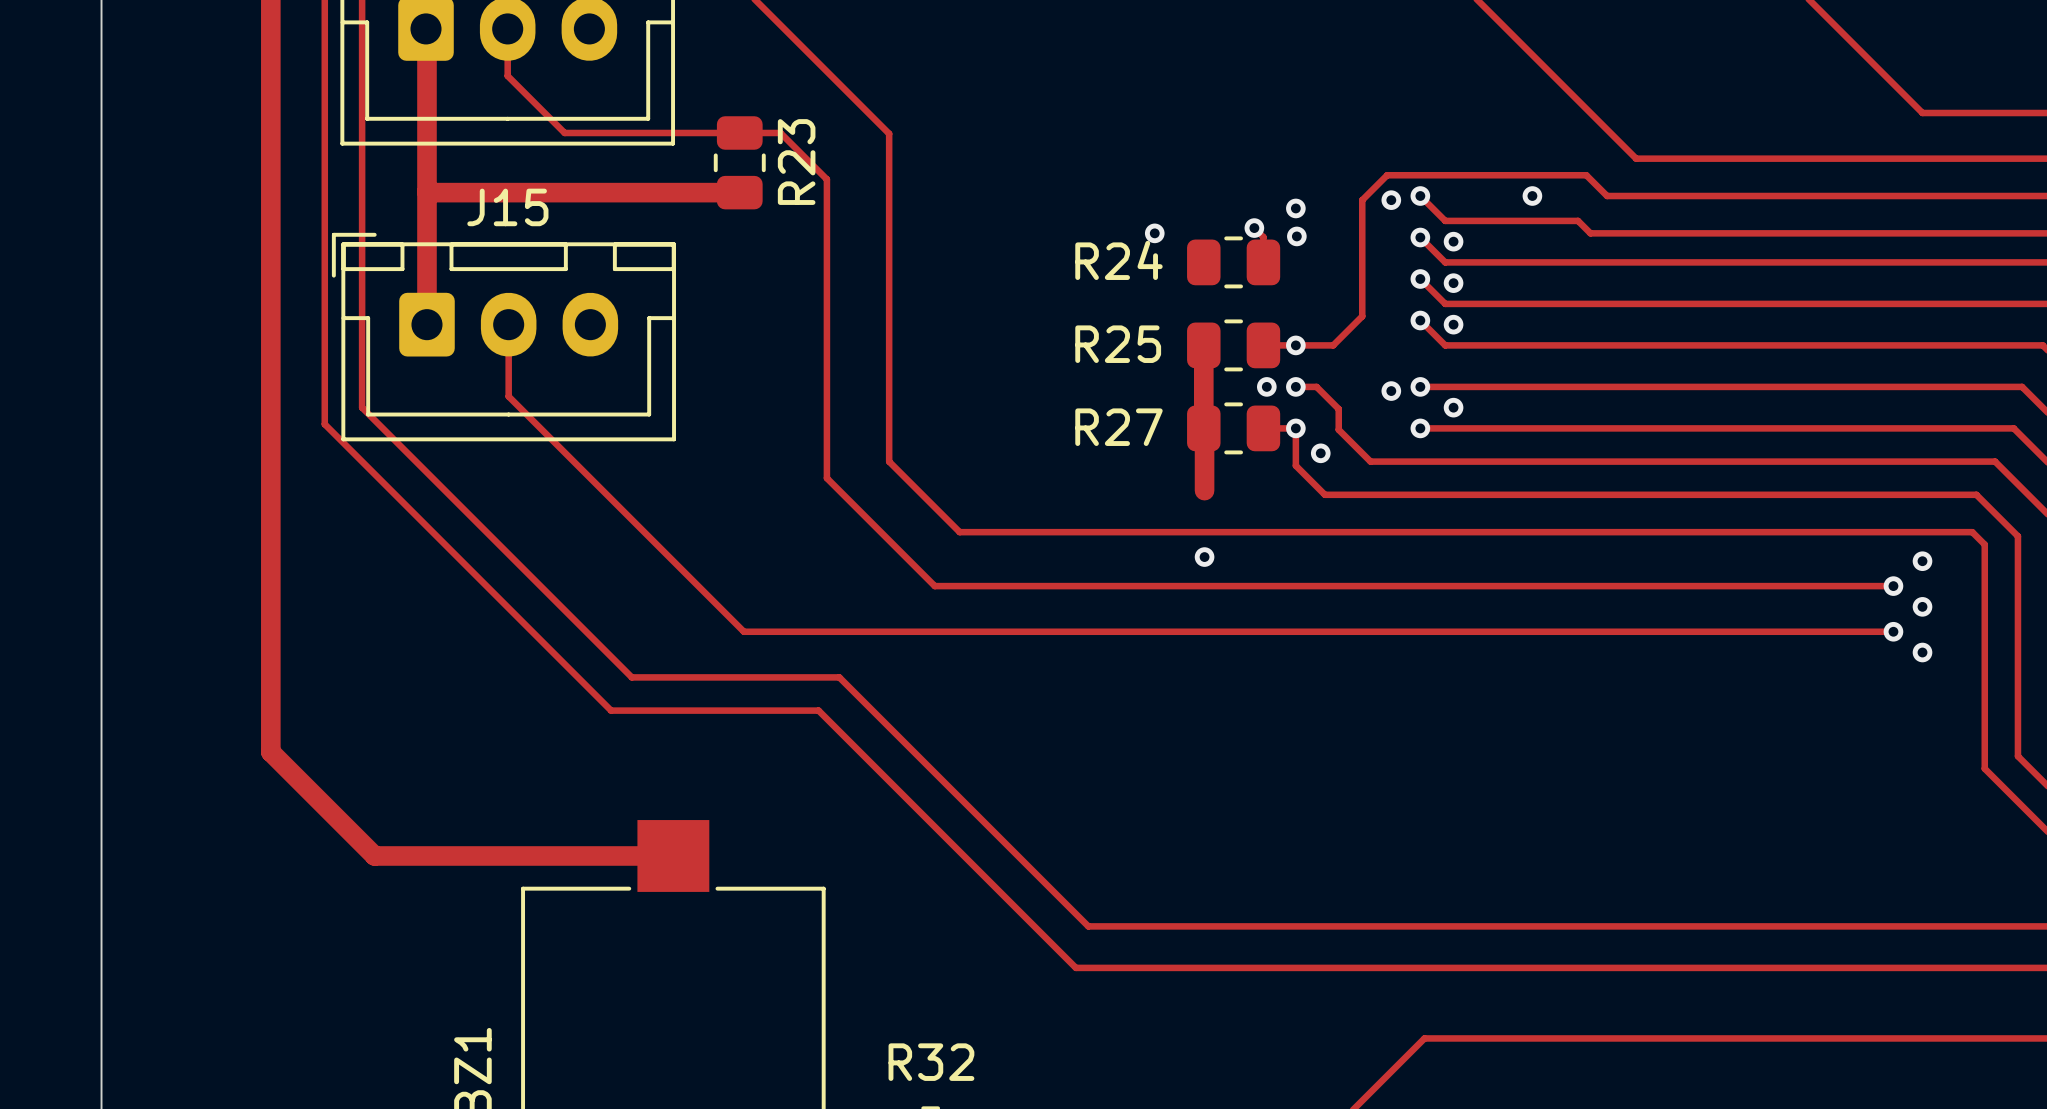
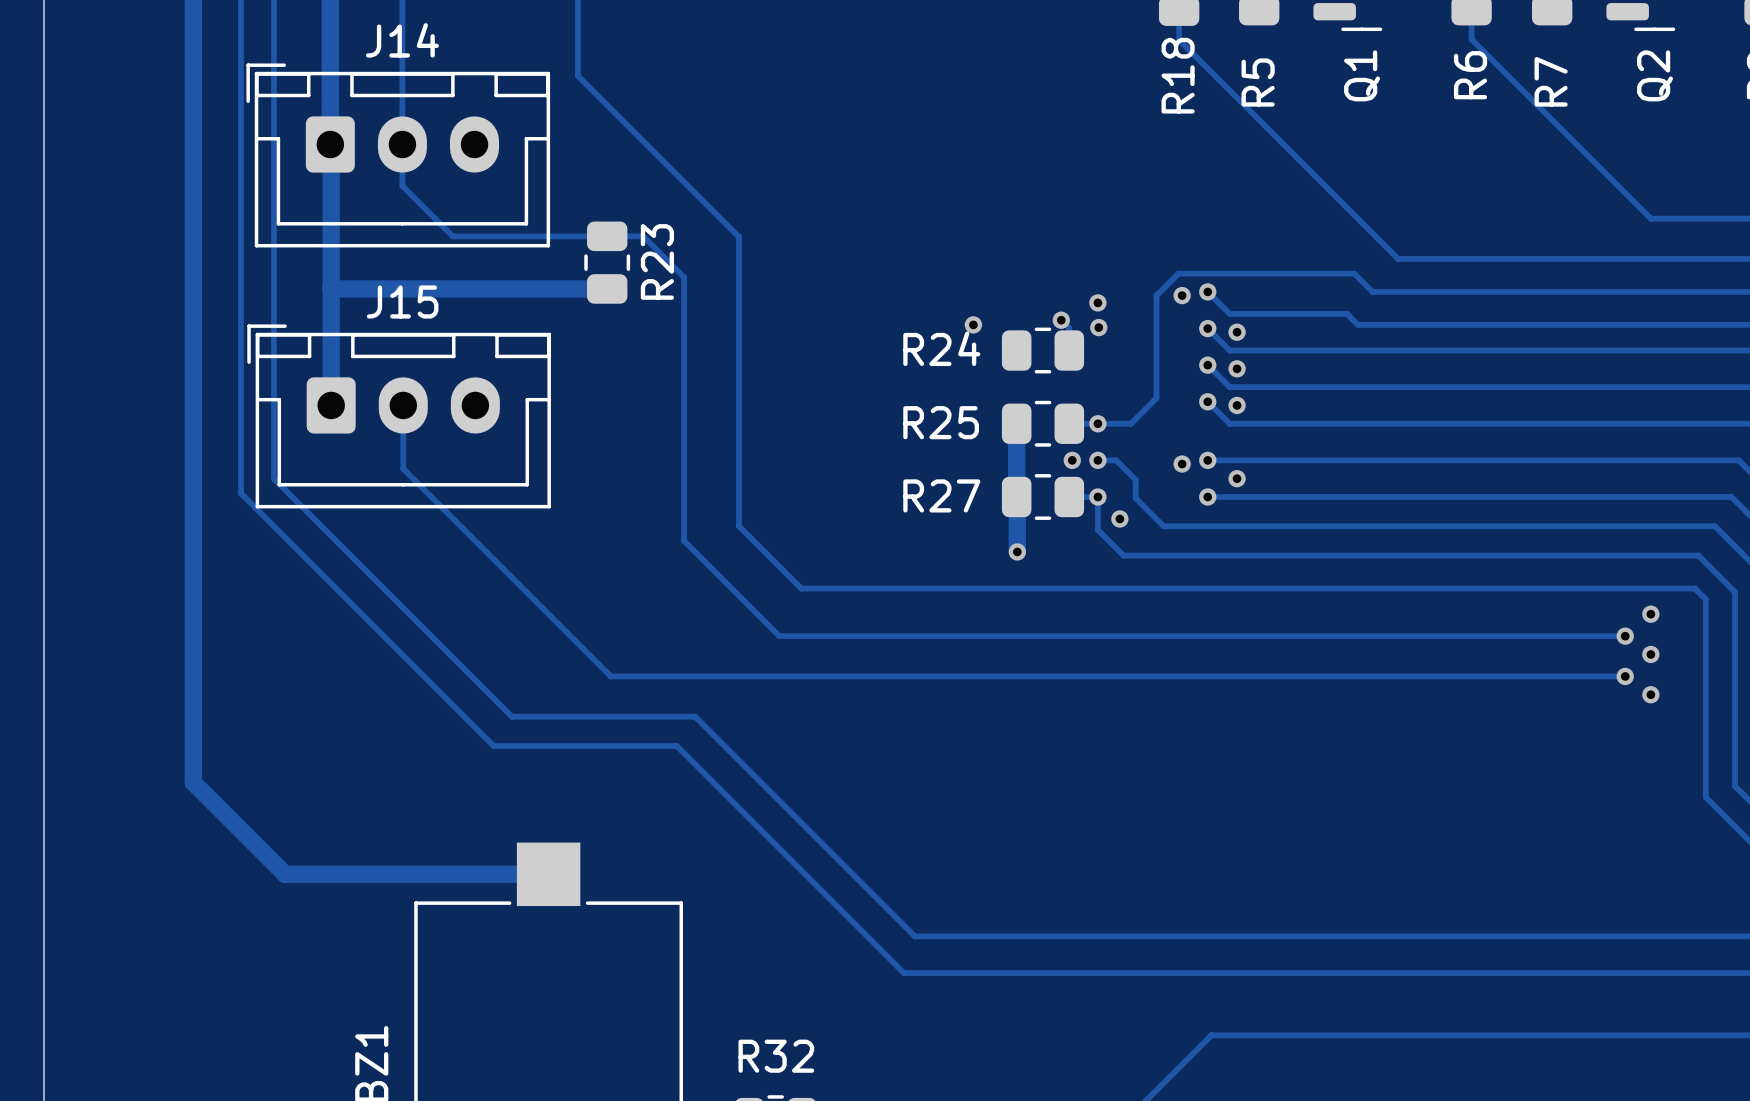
via: (1532, 196) -> none
via position: (1204, 557) -> (1017, 551)

